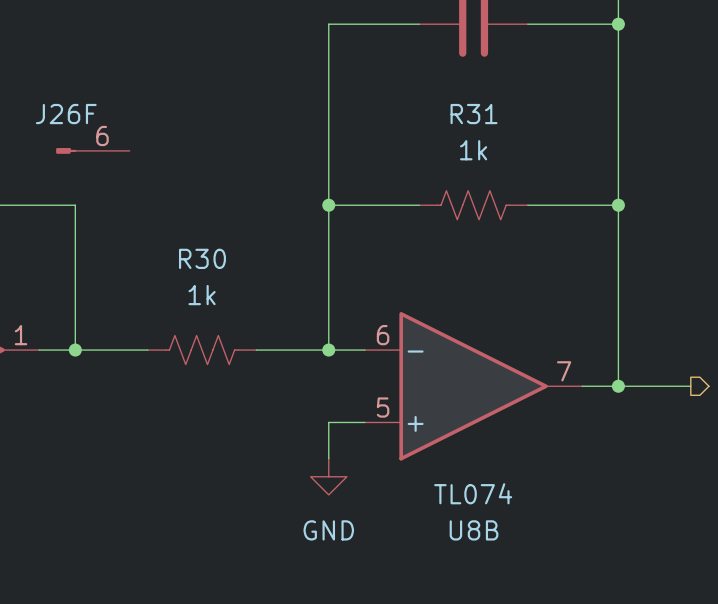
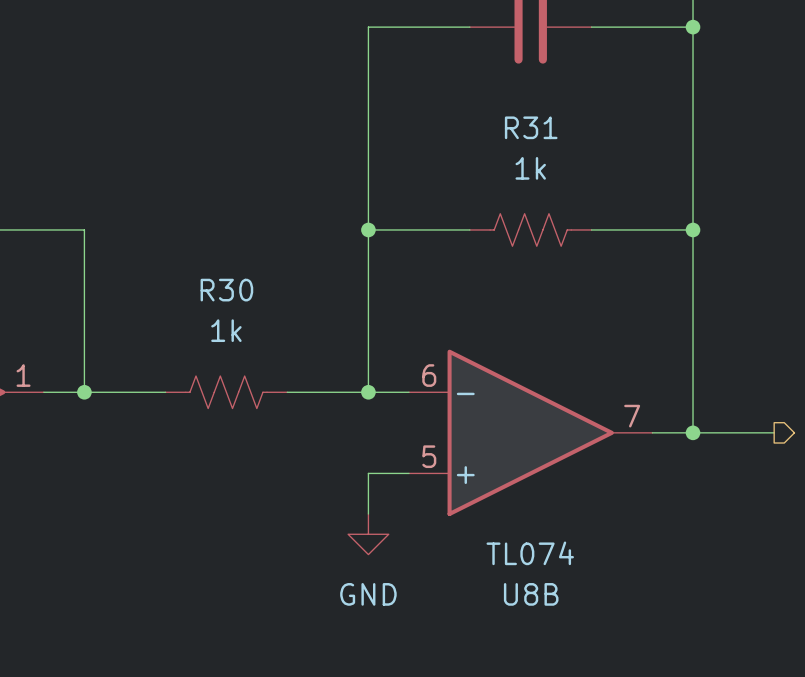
J26F: (92, 150) -> none

